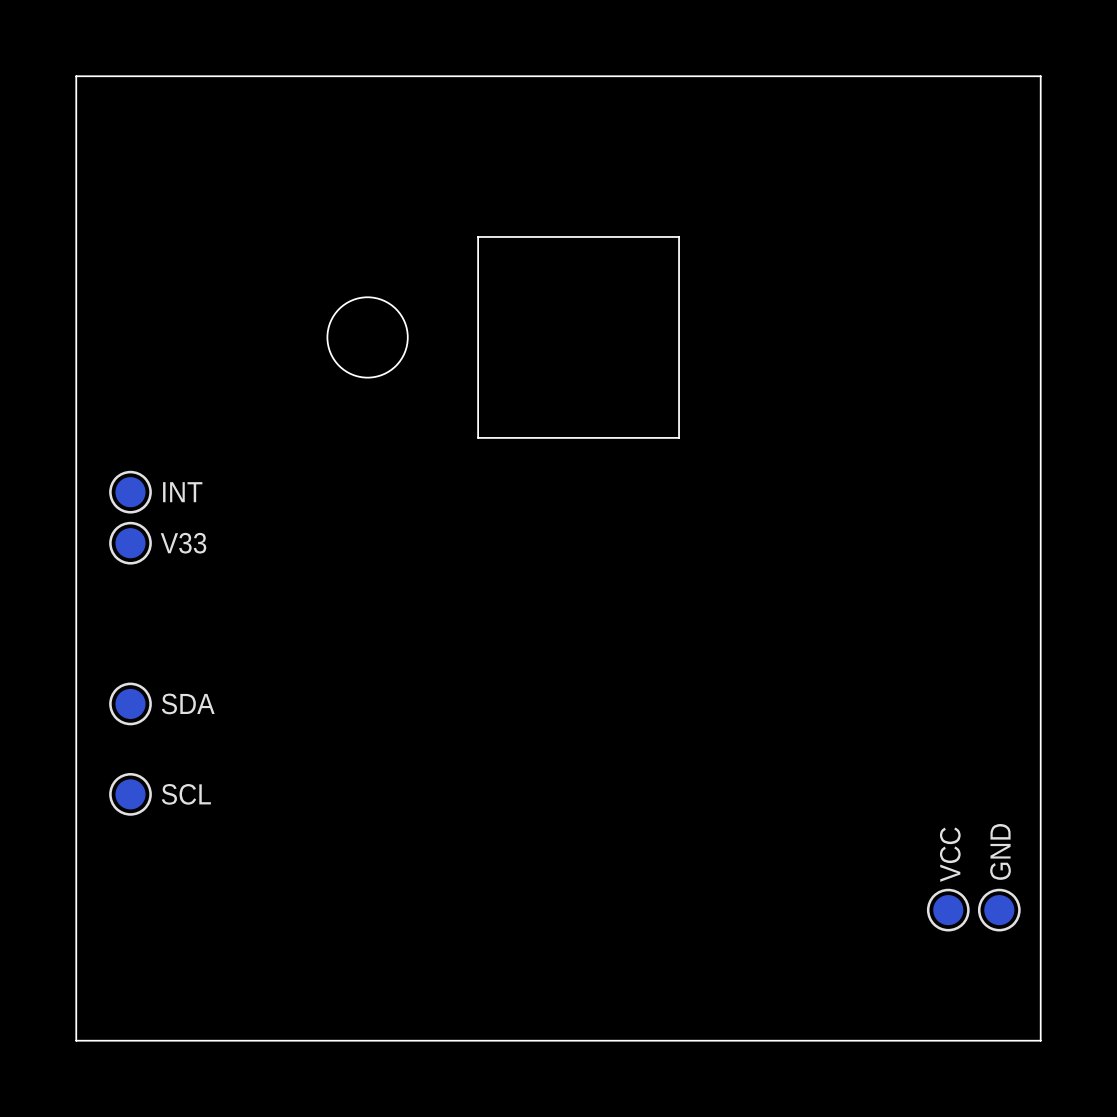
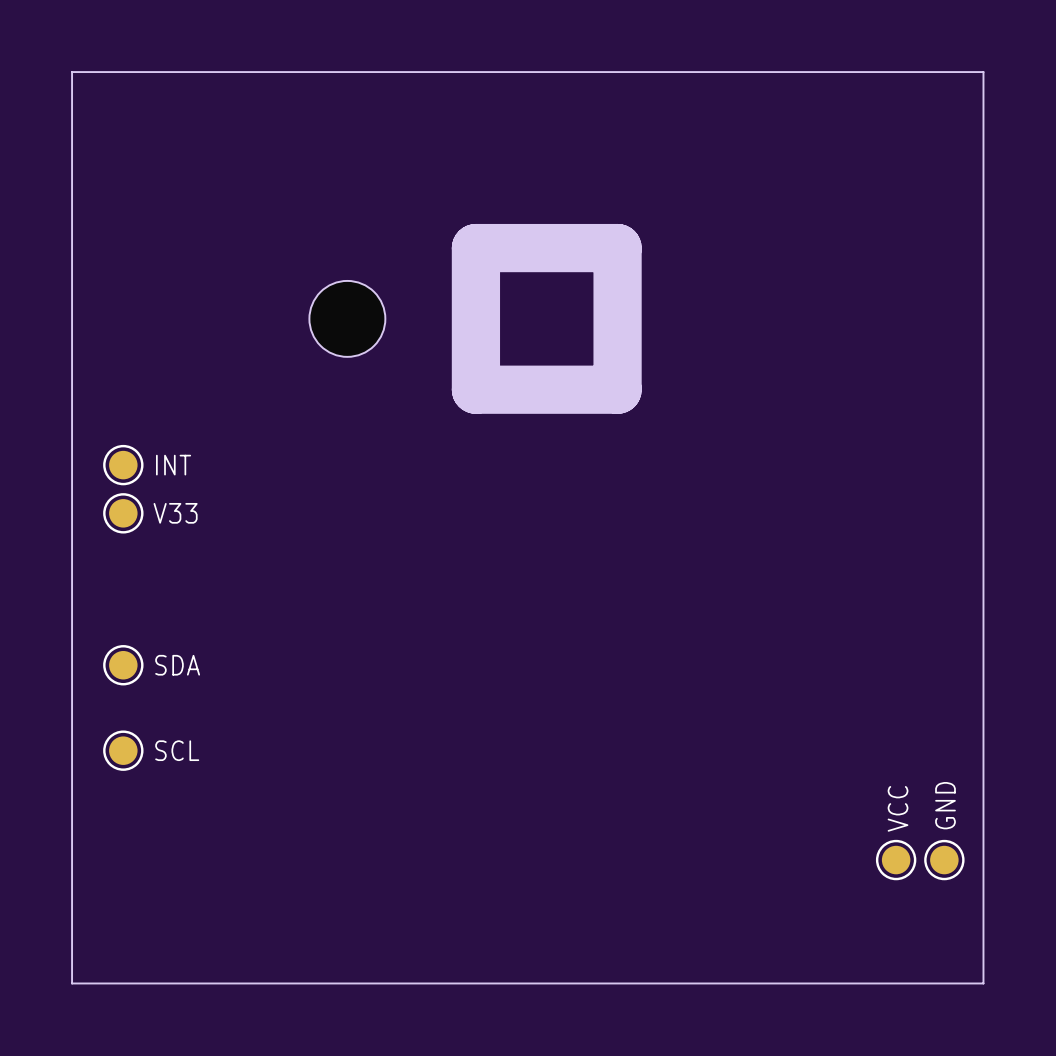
board edge: (679, 236) (478, 236) (478, 437) (679, 437) (679, 236) -> (617, 248) (617, 389) (475, 389) (475, 248) (617, 248)

